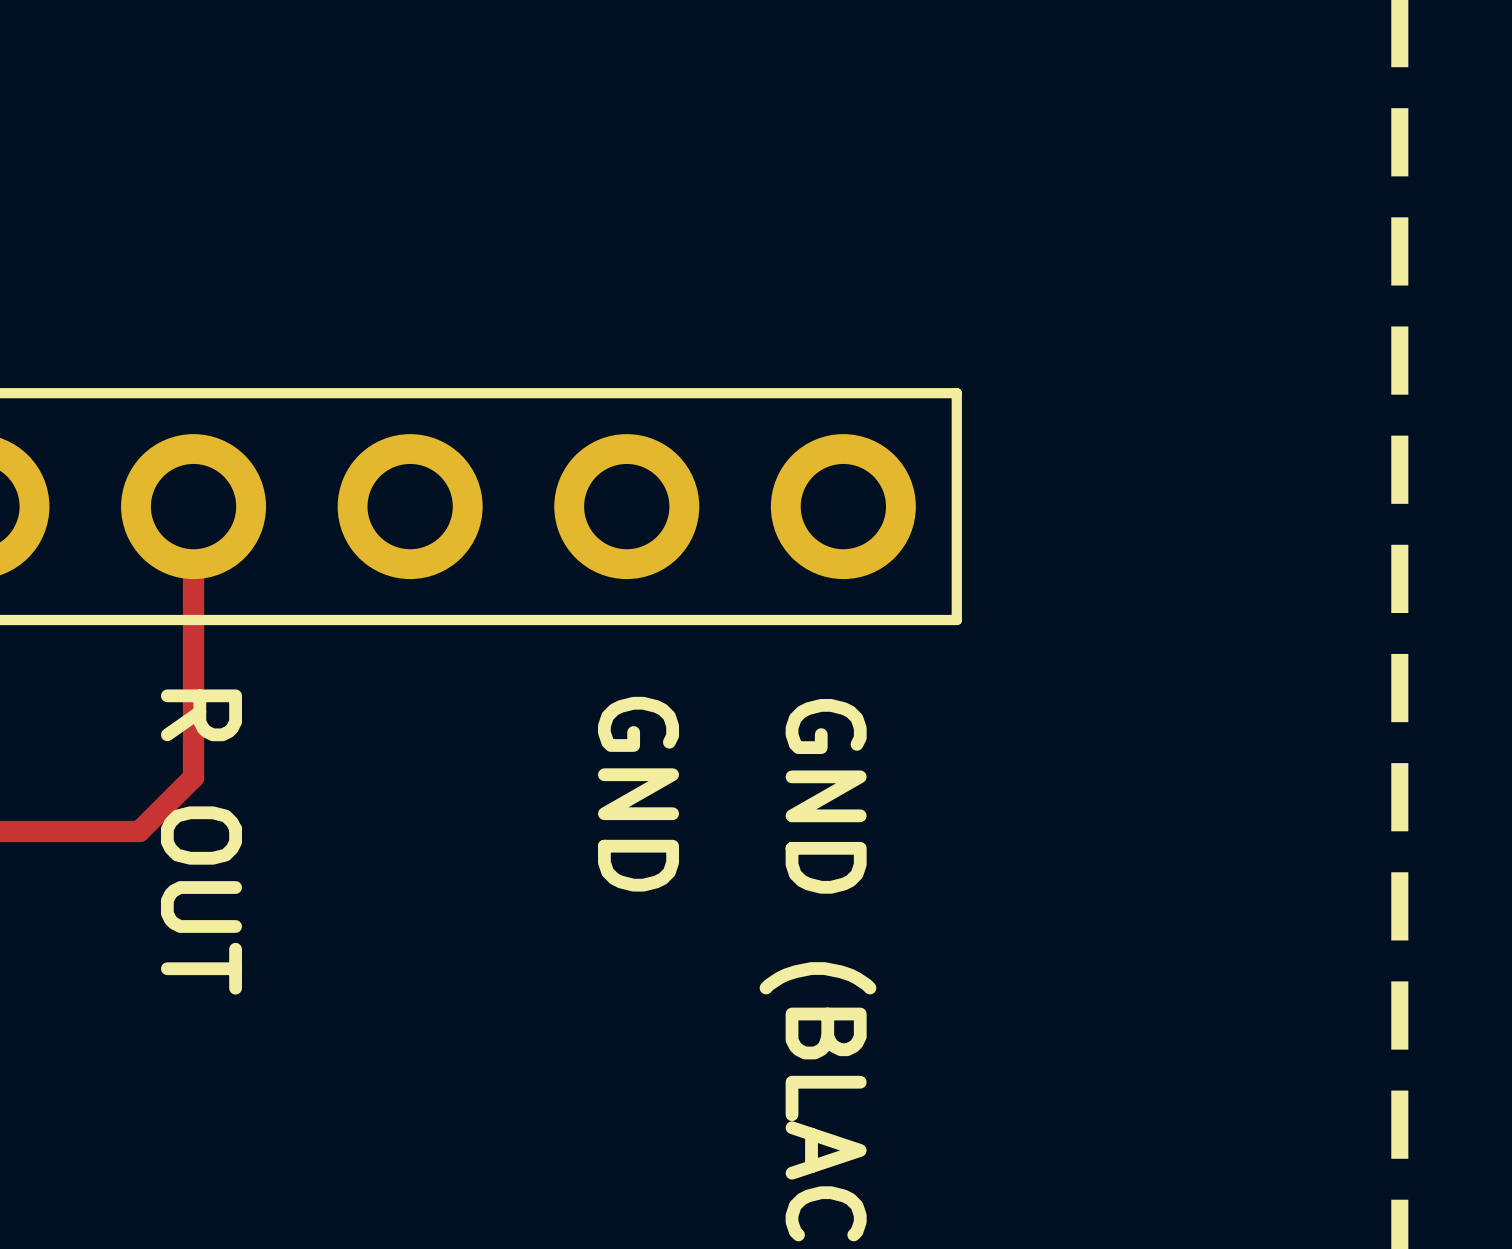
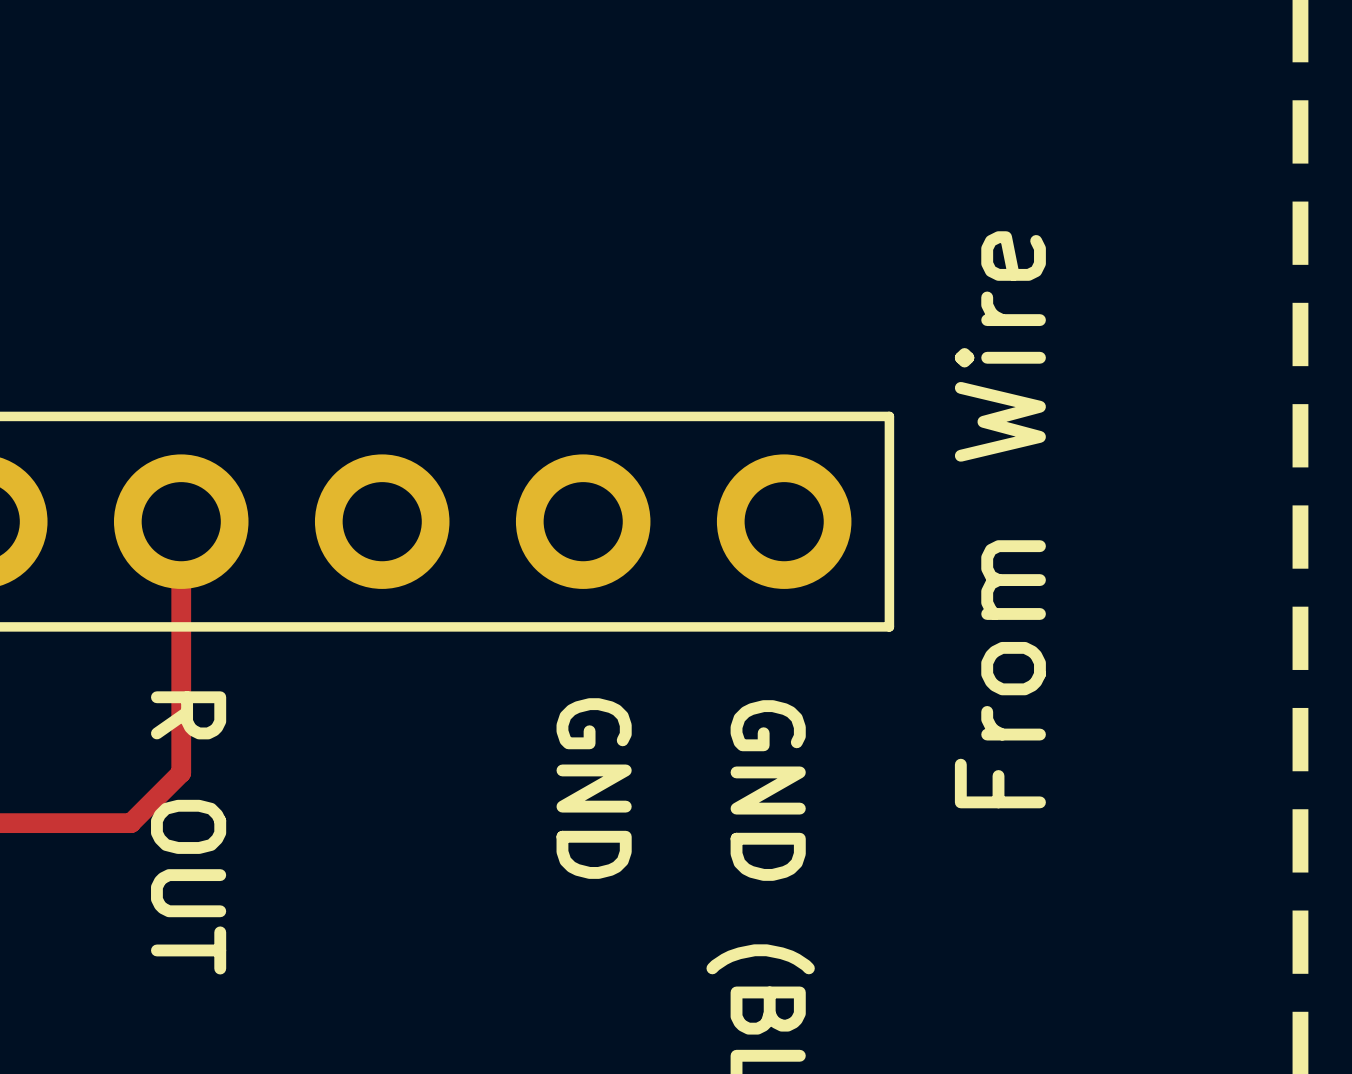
part value: none -> From Wire (1000, 519)

